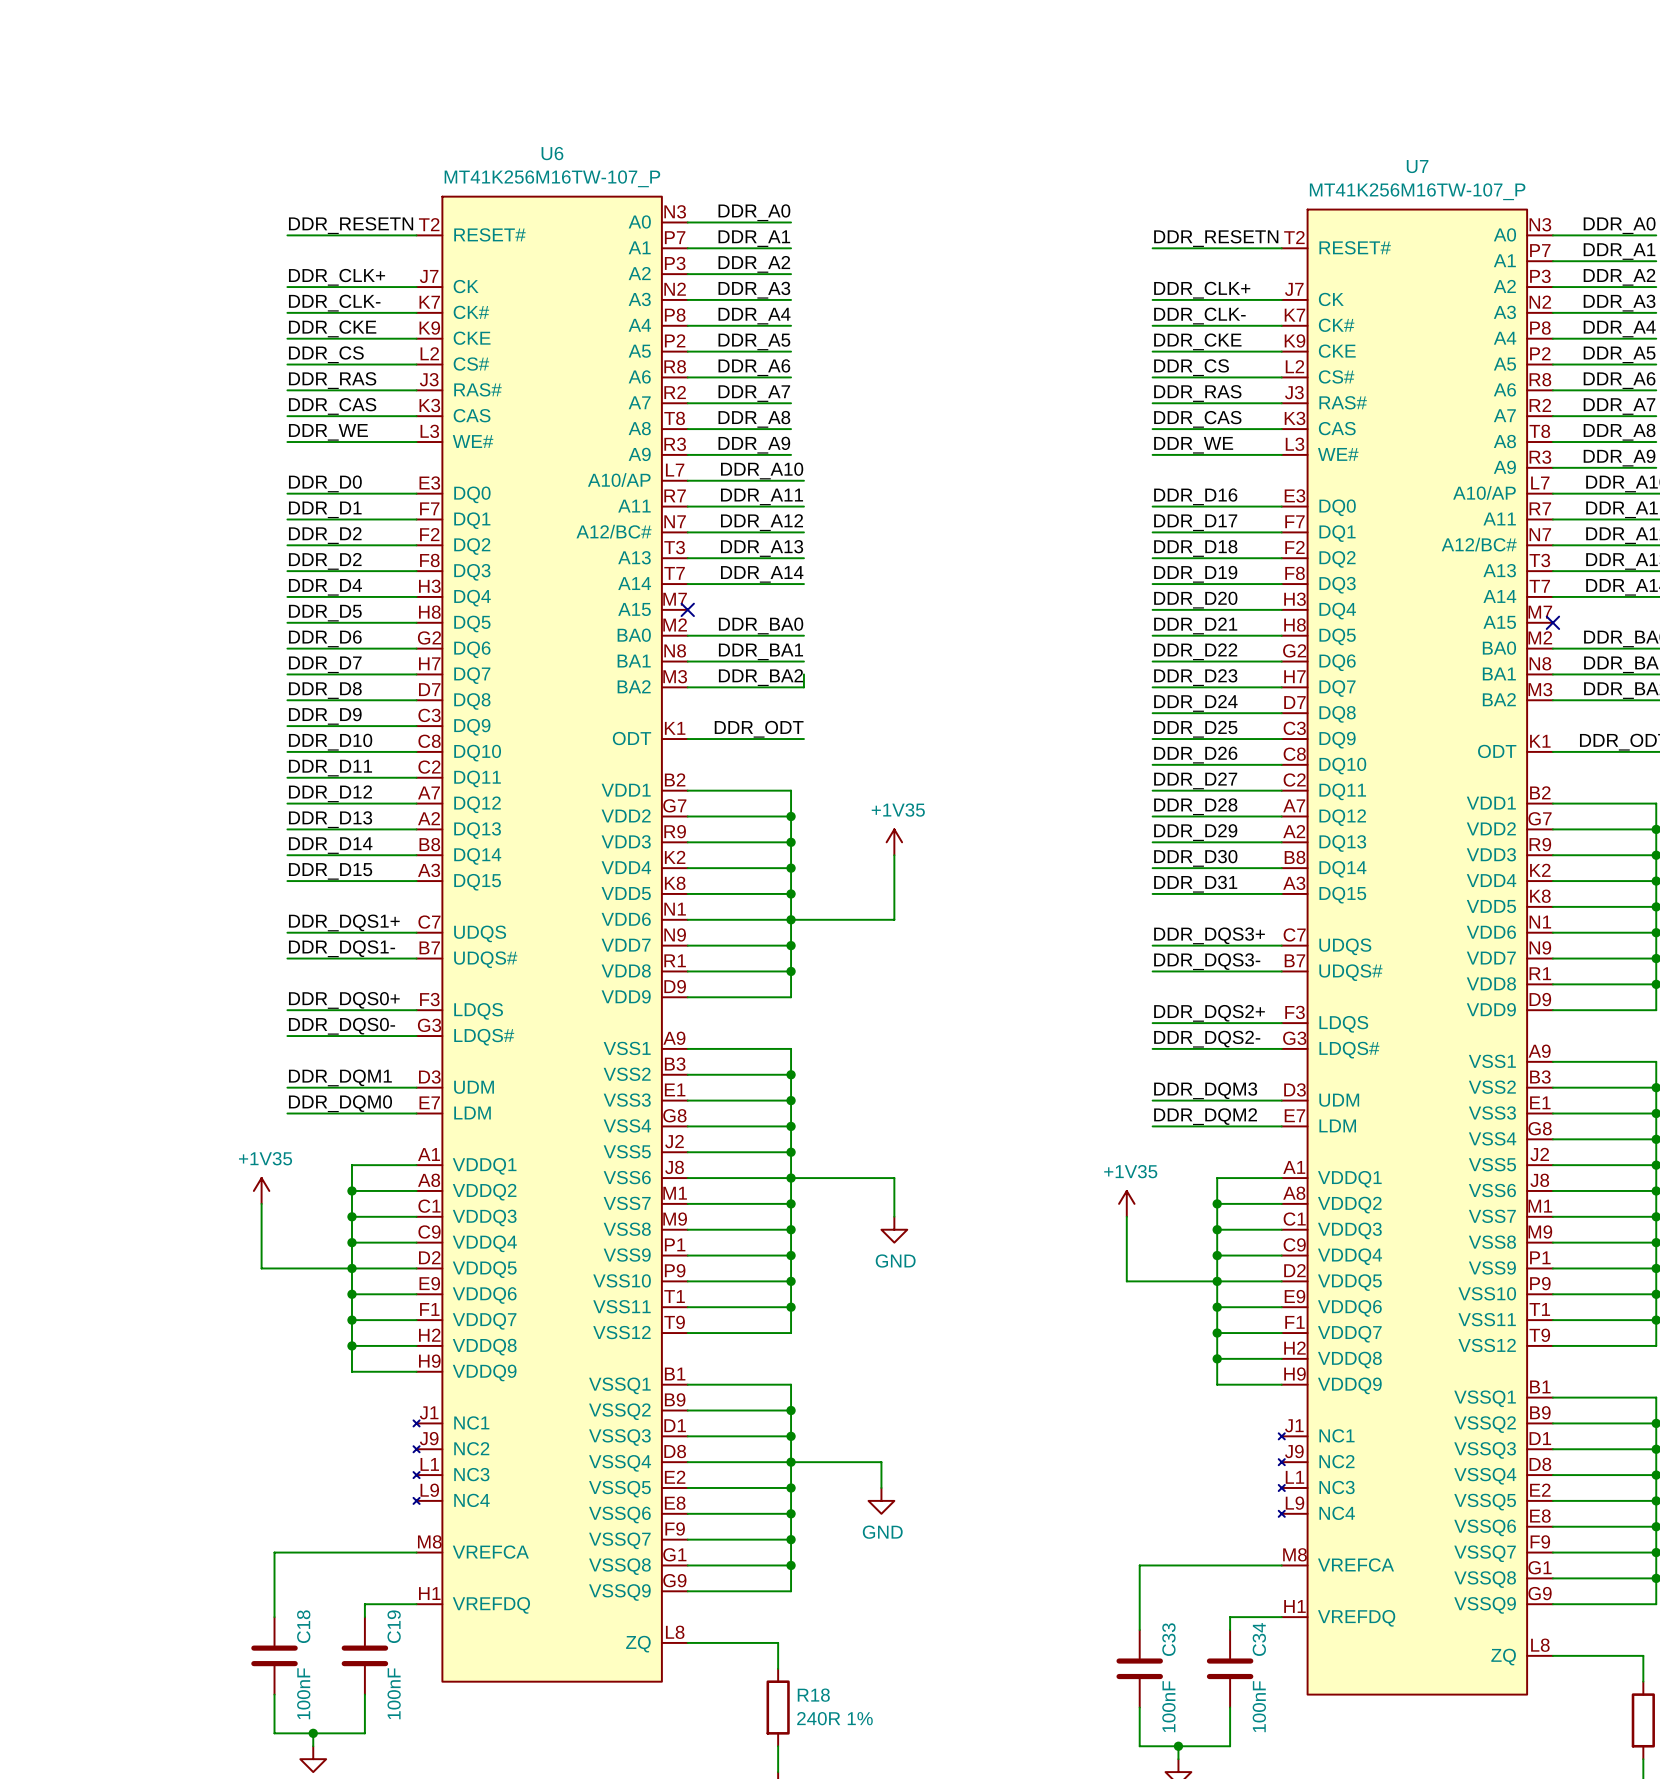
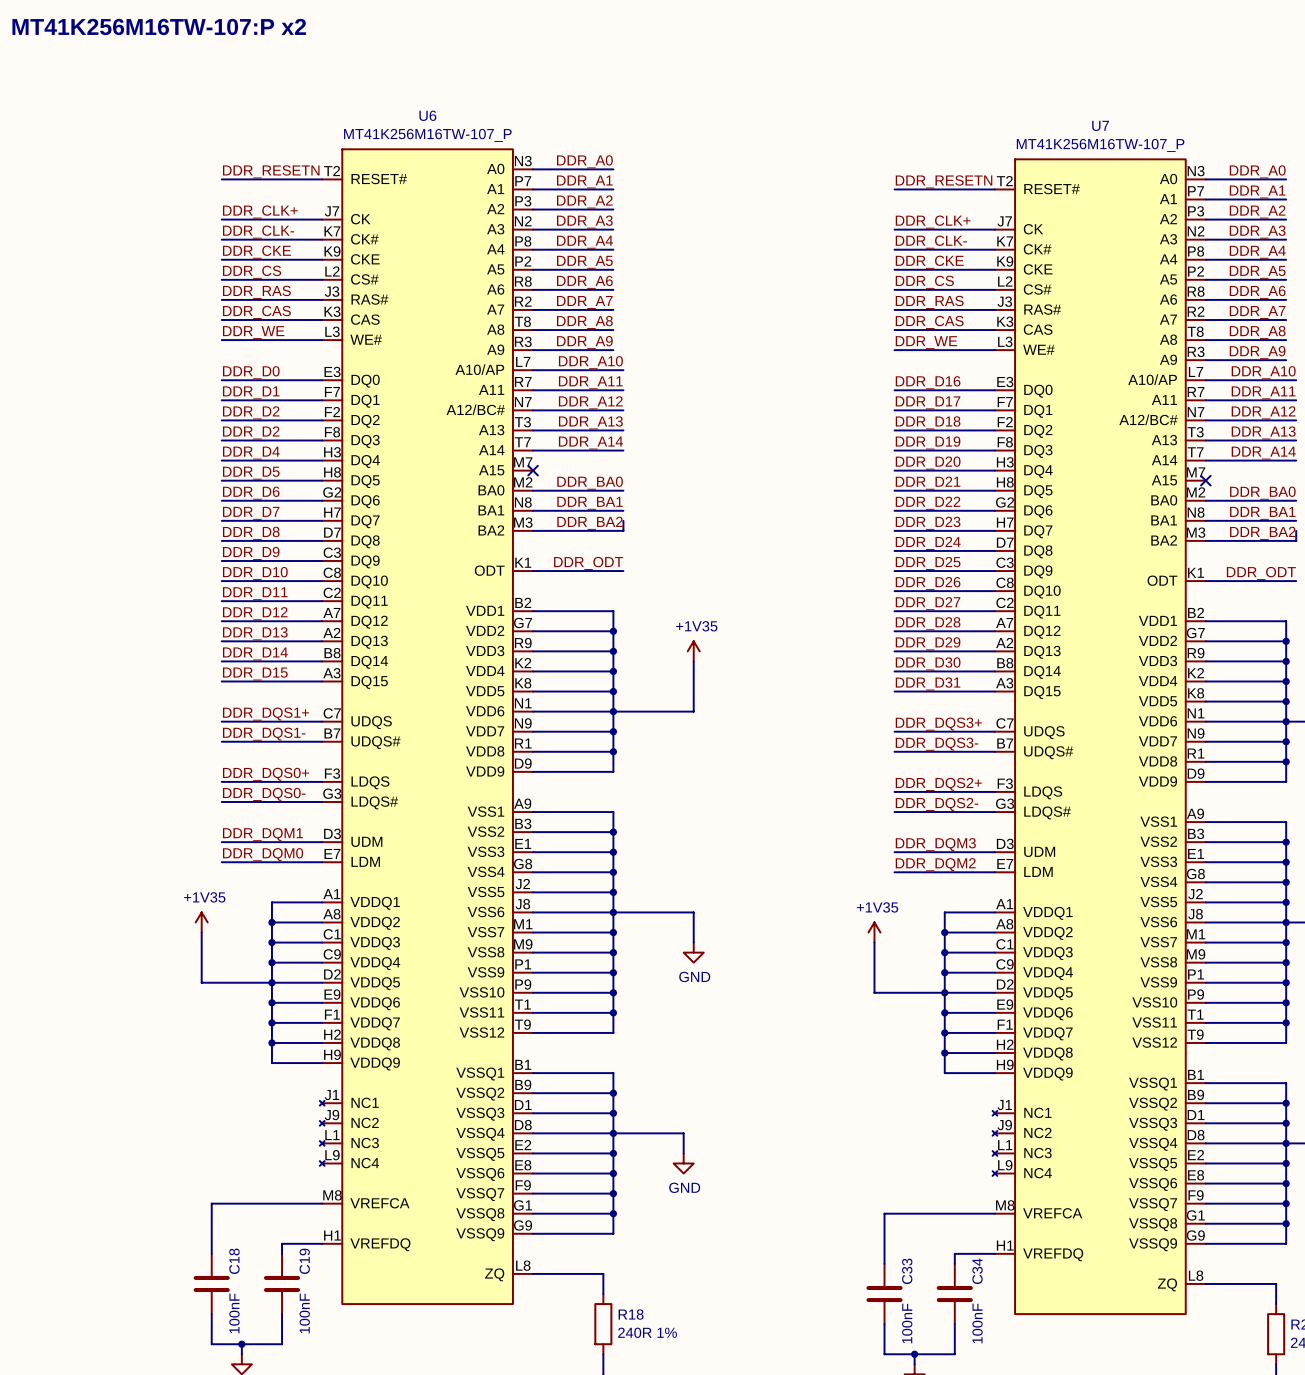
text: none -> MT41K256M16TW-107:P x2 (159, 26)

